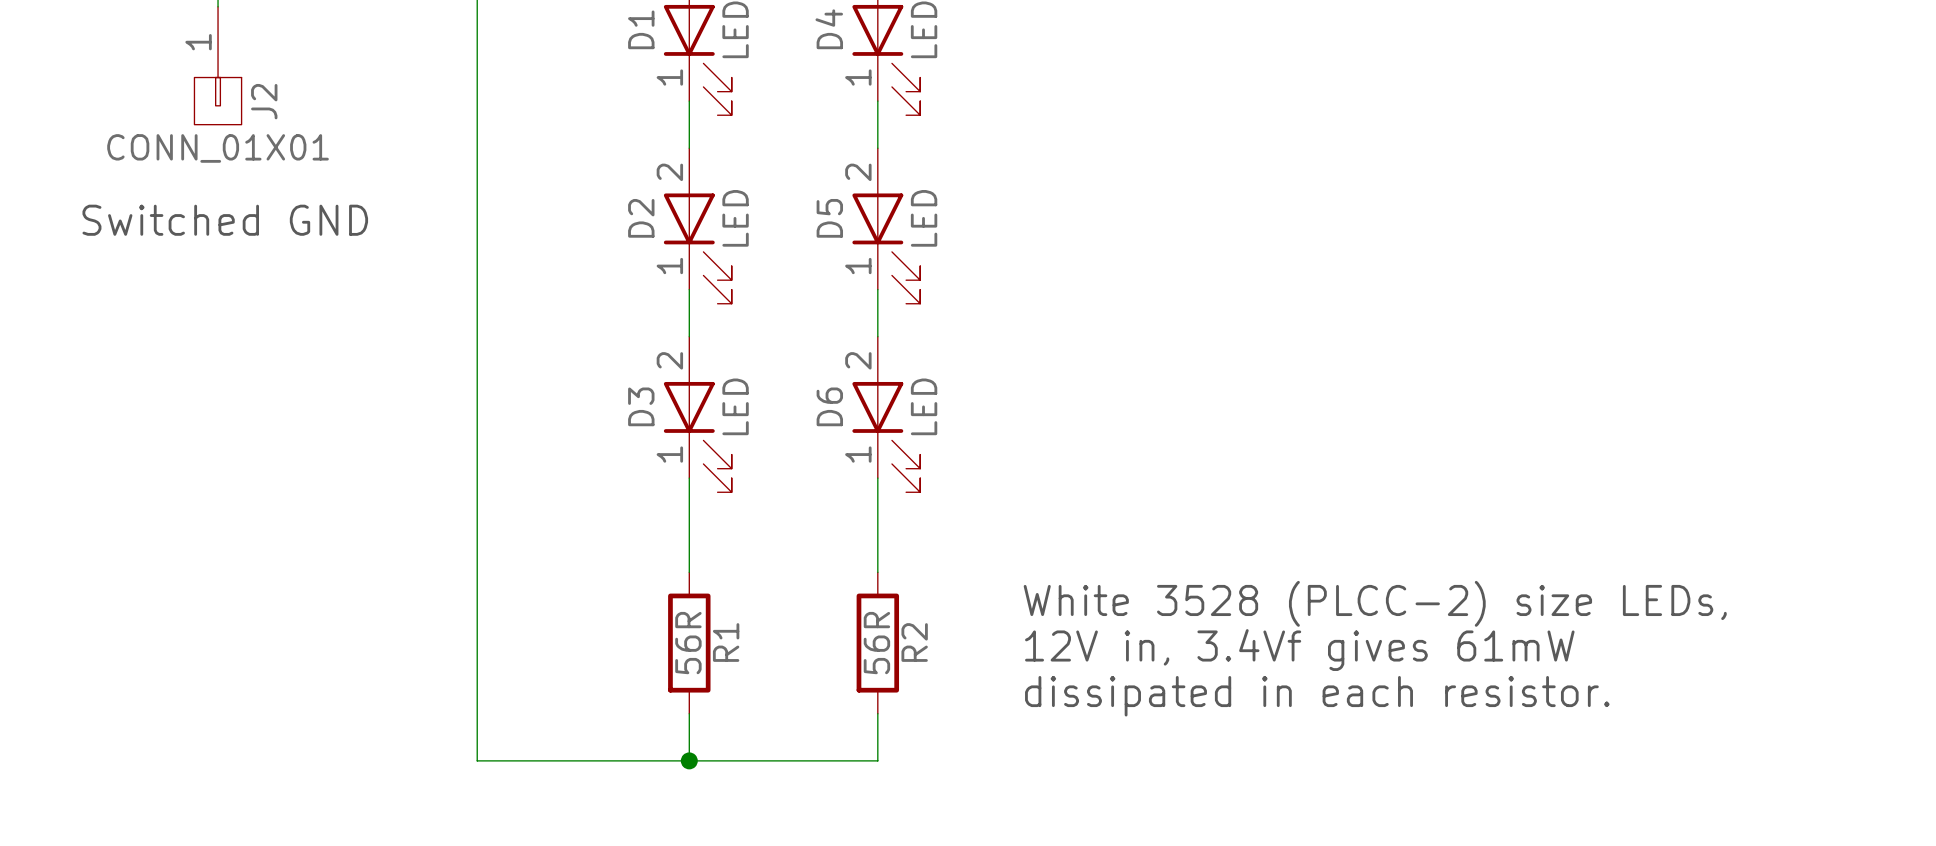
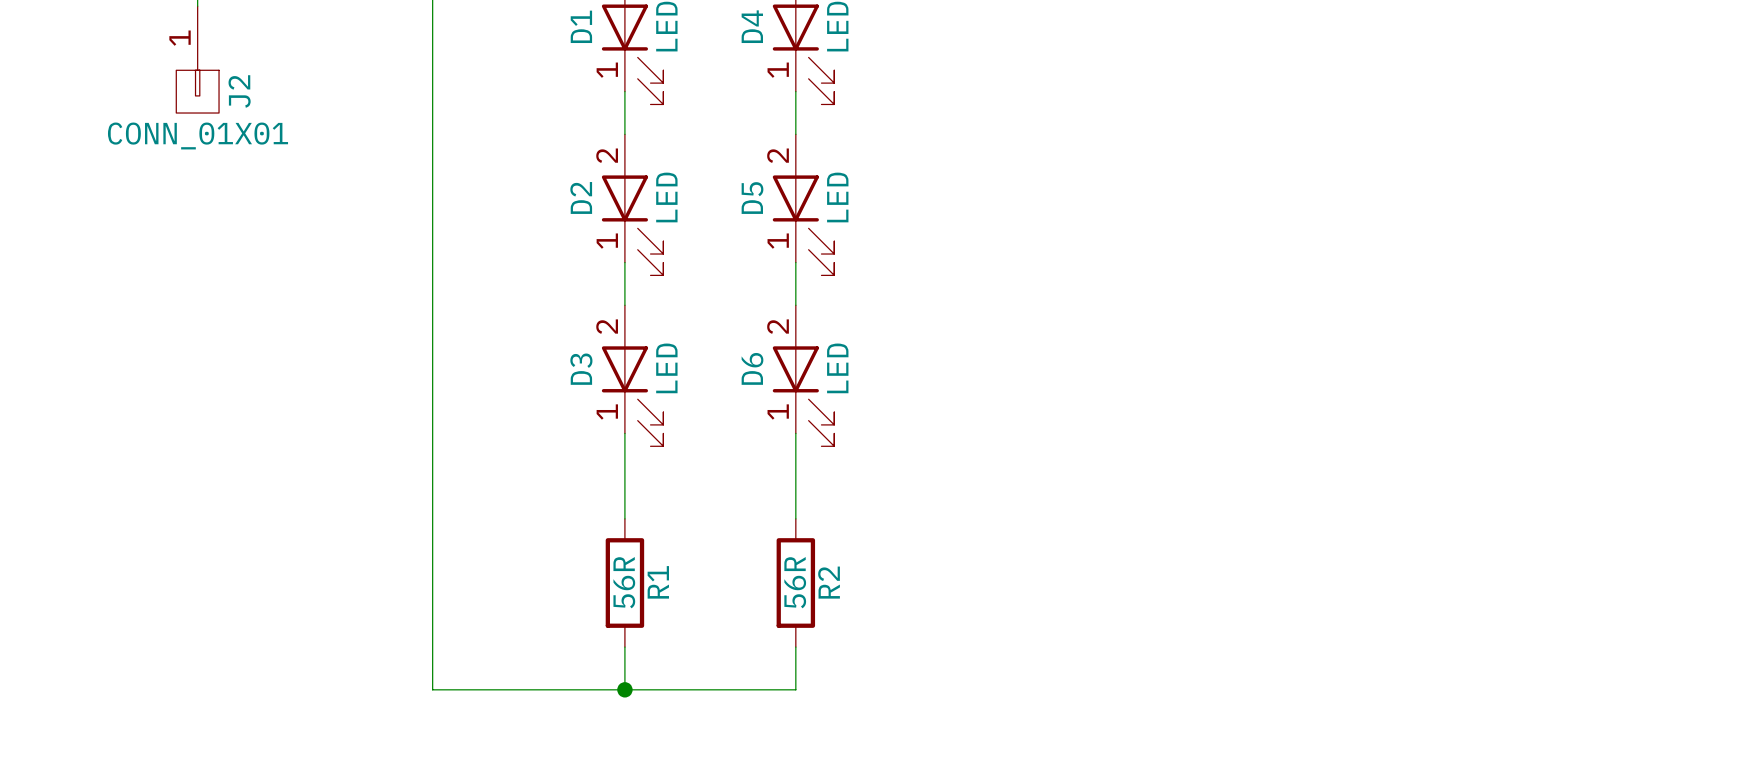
text: Switched GND (225, 220) -> none
text: White 3528 (PLCC-2) size LEDs, (1375, 603) -> none
text: 12V in, 3.4Vf gives 61mW (1299, 650) -> none
text: dissipated in each resistor. (1317, 696) -> none

